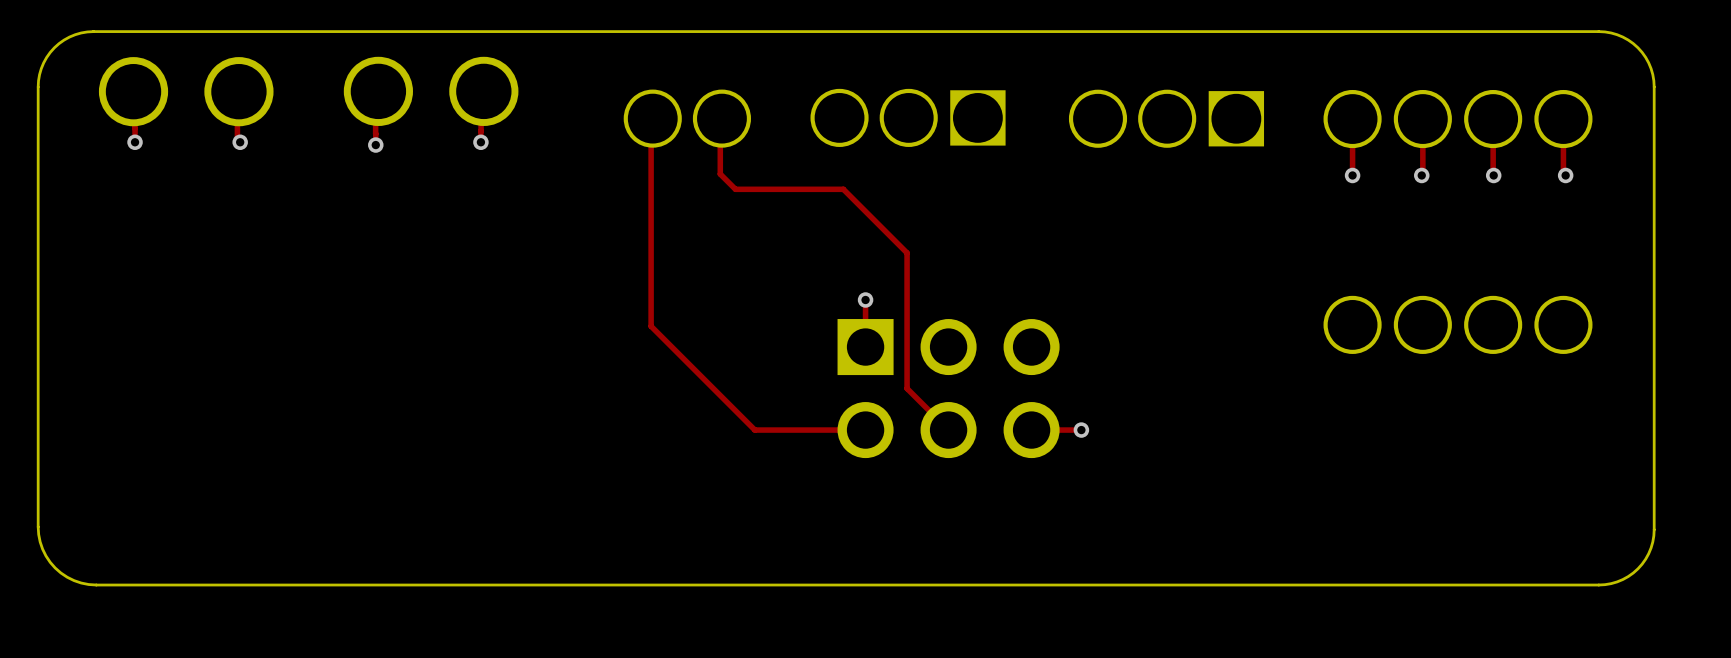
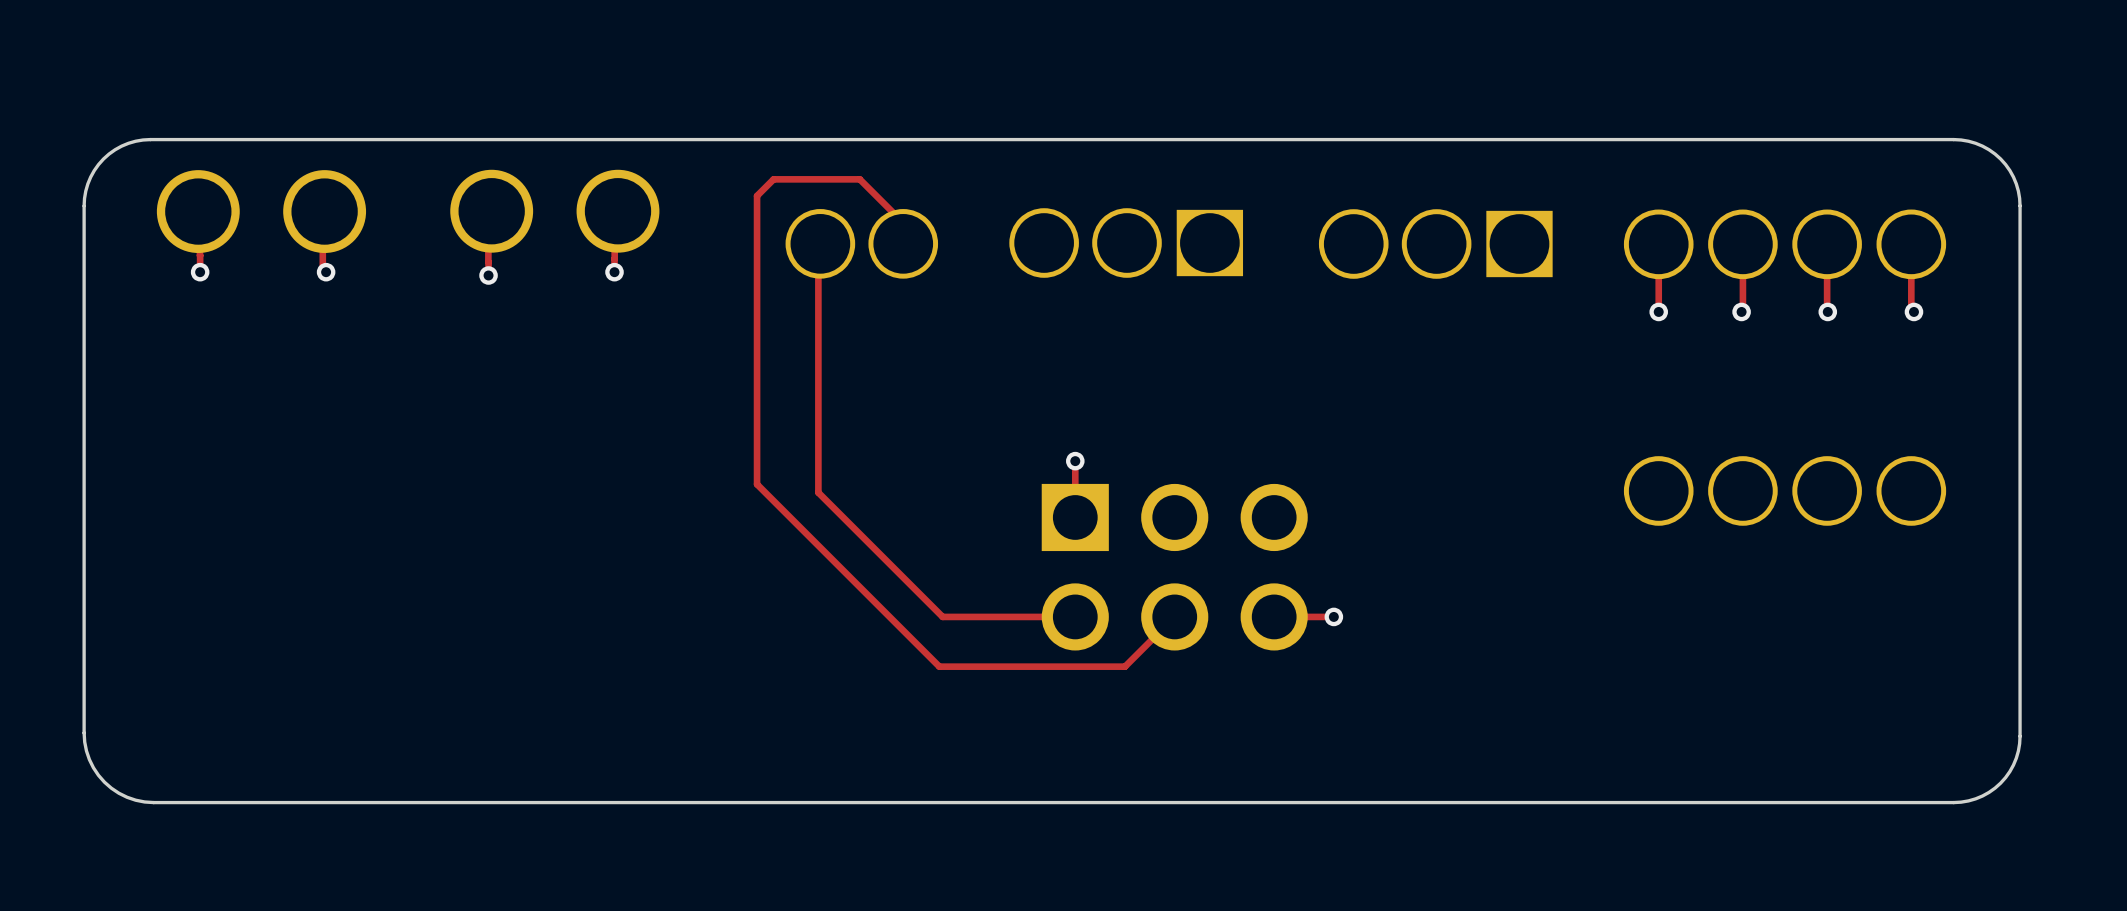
top track: (727, 117) (720, 124) (720, 174) (735, 189) (843, 189) (907, 252) (907, 388) (948, 430) -> (903, 243) (903, 222) (859, 179) (773, 179) (757, 195) (757, 484) (939, 666) (1125, 666) (1174, 616)

